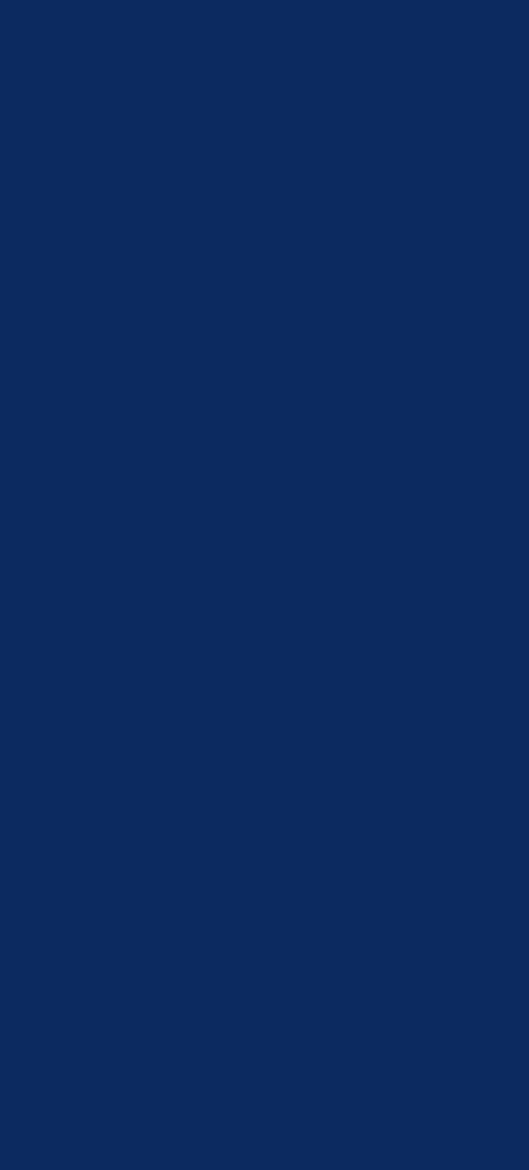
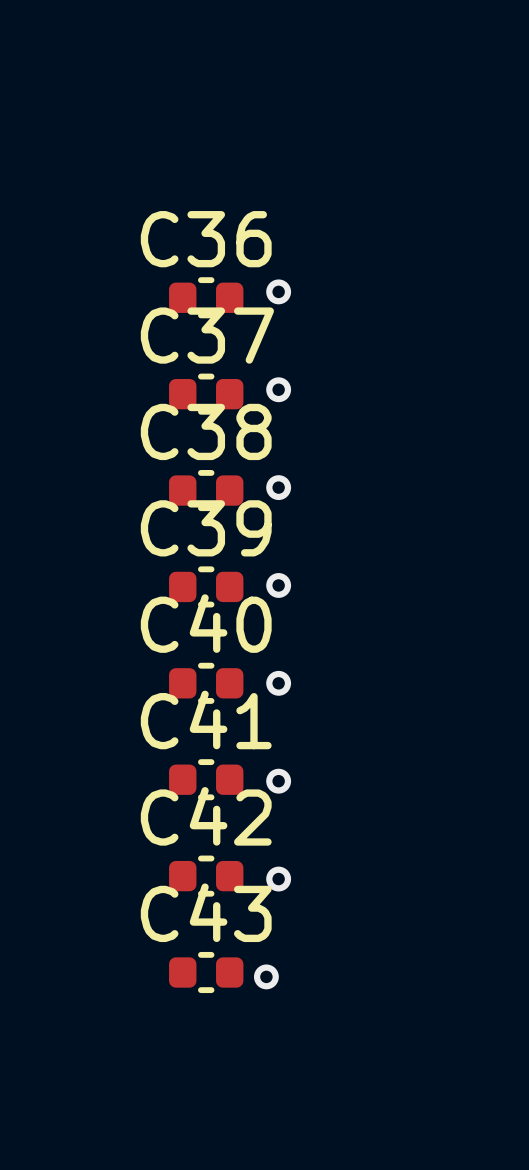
via: none -> (278, 291)
C36: none -> (206, 297)
via: none -> (278, 389)
C37: none -> (206, 394)
via: none -> (278, 487)
C38: none -> (206, 490)
via: none -> (278, 585)
C39: none -> (206, 586)
C40: none -> (206, 683)
via: none -> (278, 683)
C41: none -> (206, 779)
via: none -> (278, 781)
C42: none -> (206, 876)
via: none -> (278, 879)
C43: none -> (206, 972)
via: none -> (266, 976)

